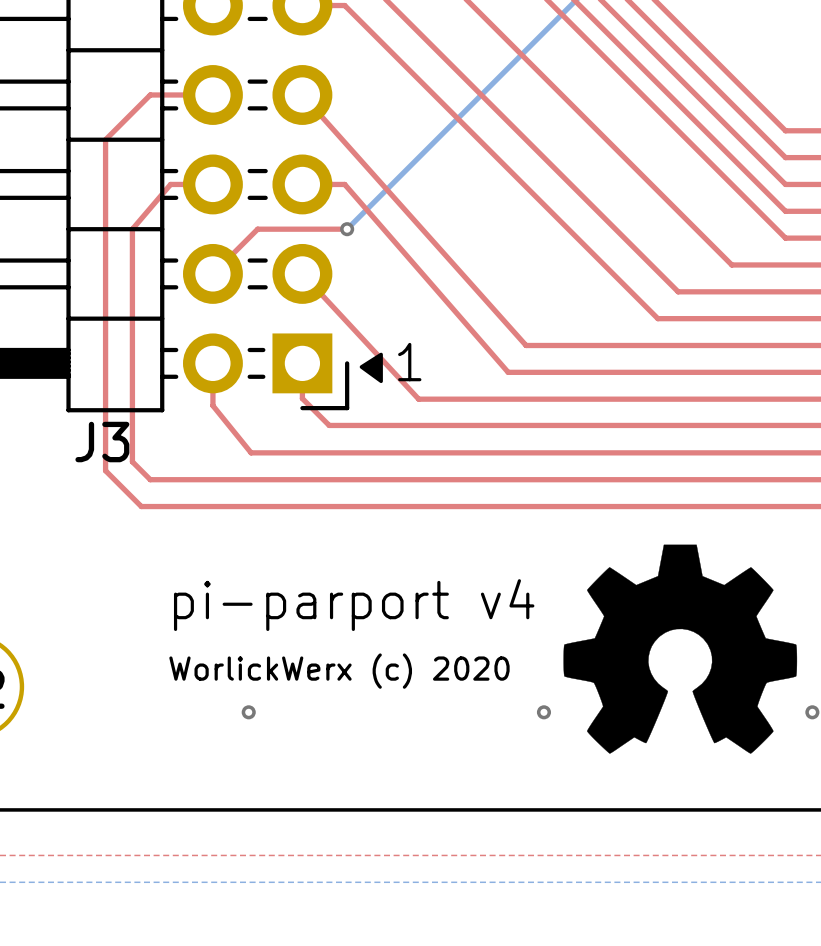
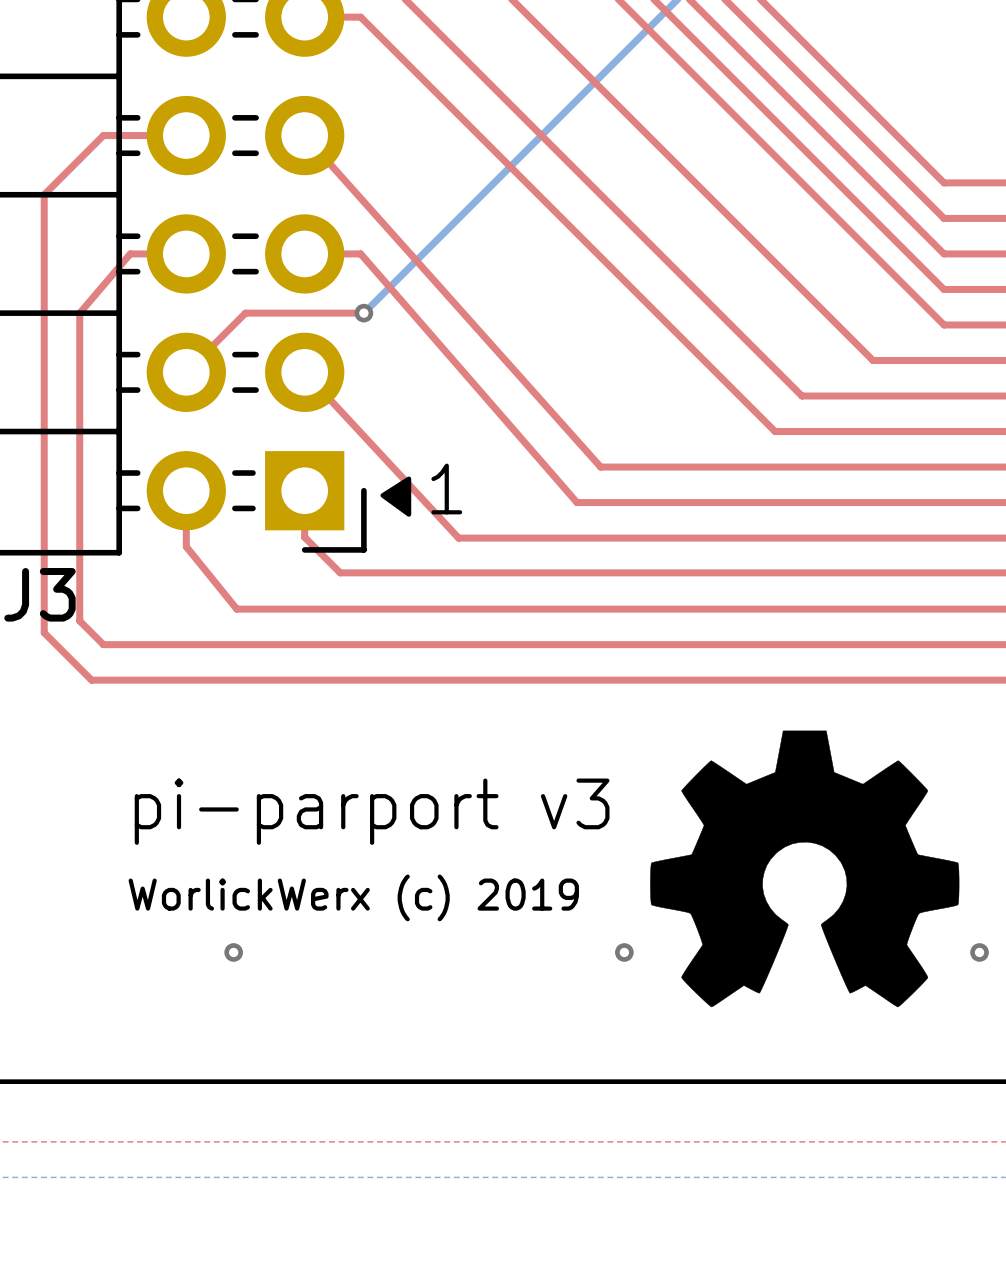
text: pi-parport v4 (354, 605) -> pi-parport v3 (372, 811)
text: WorlickWerx (c) 2020 (339, 671) -> WorlickWerx (c) 2019 (353, 897)

